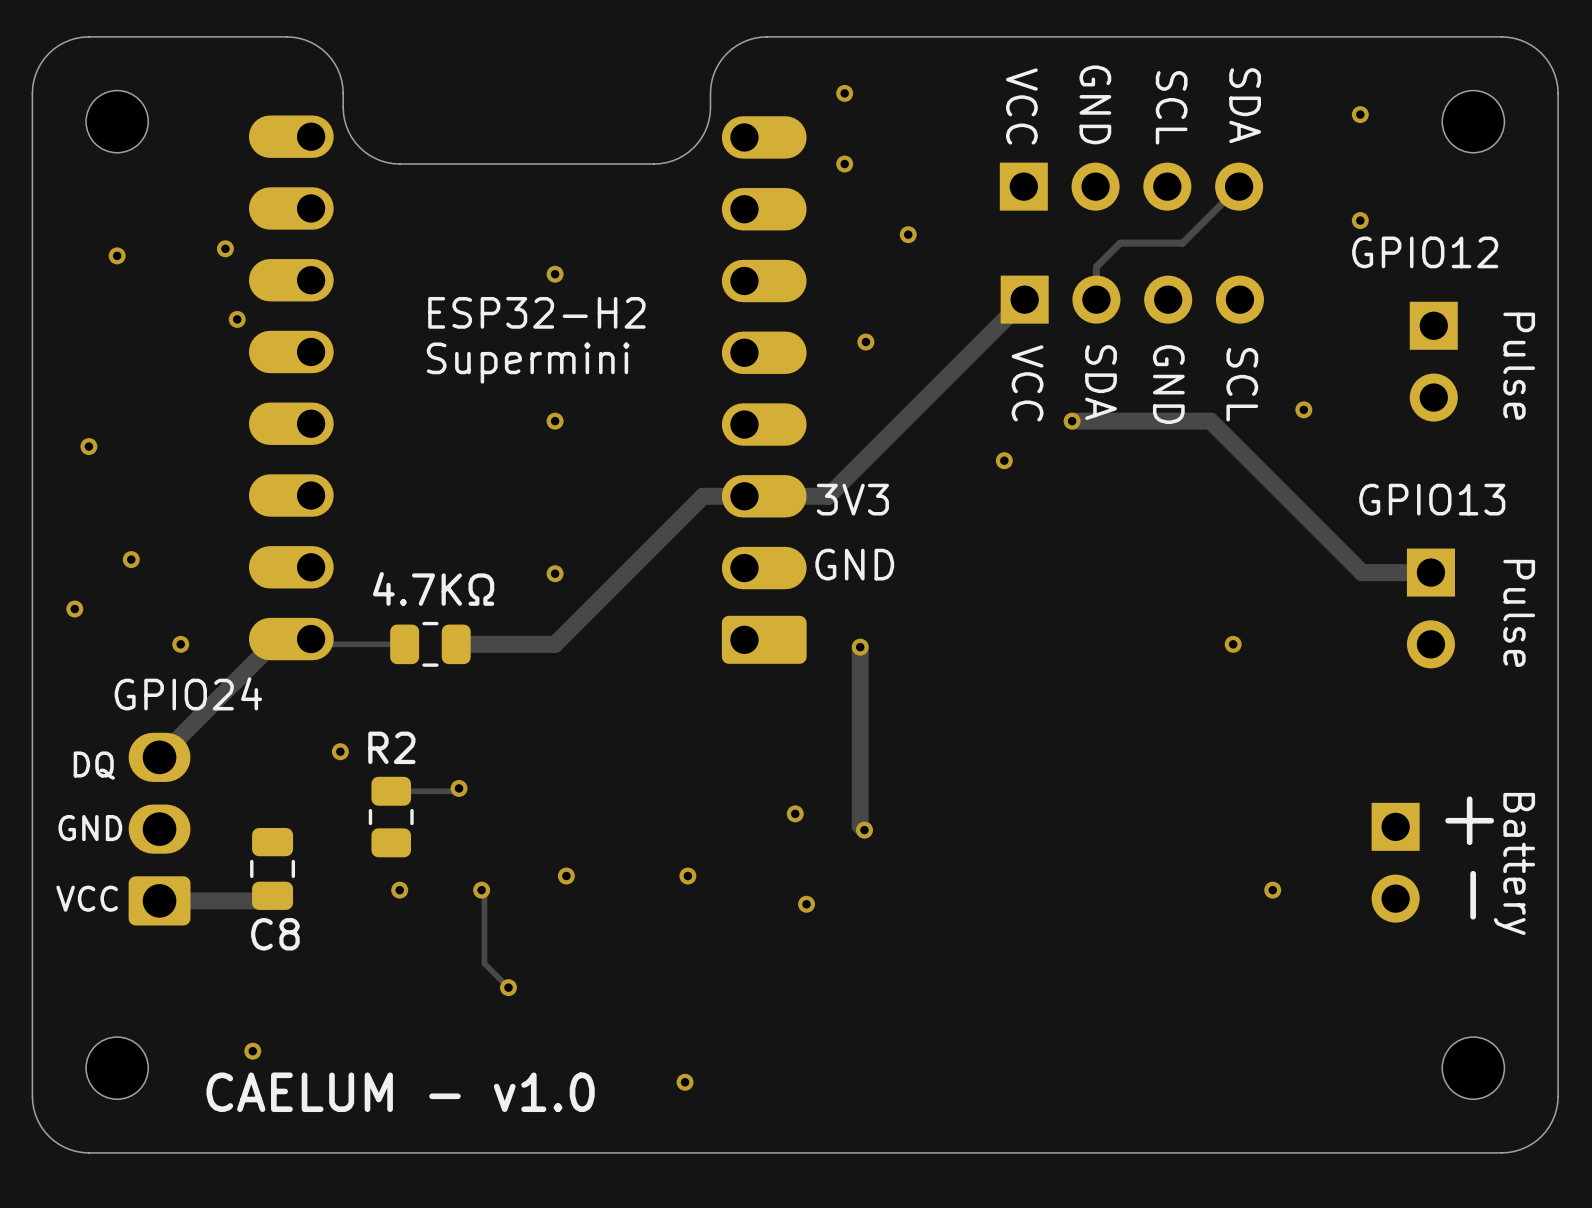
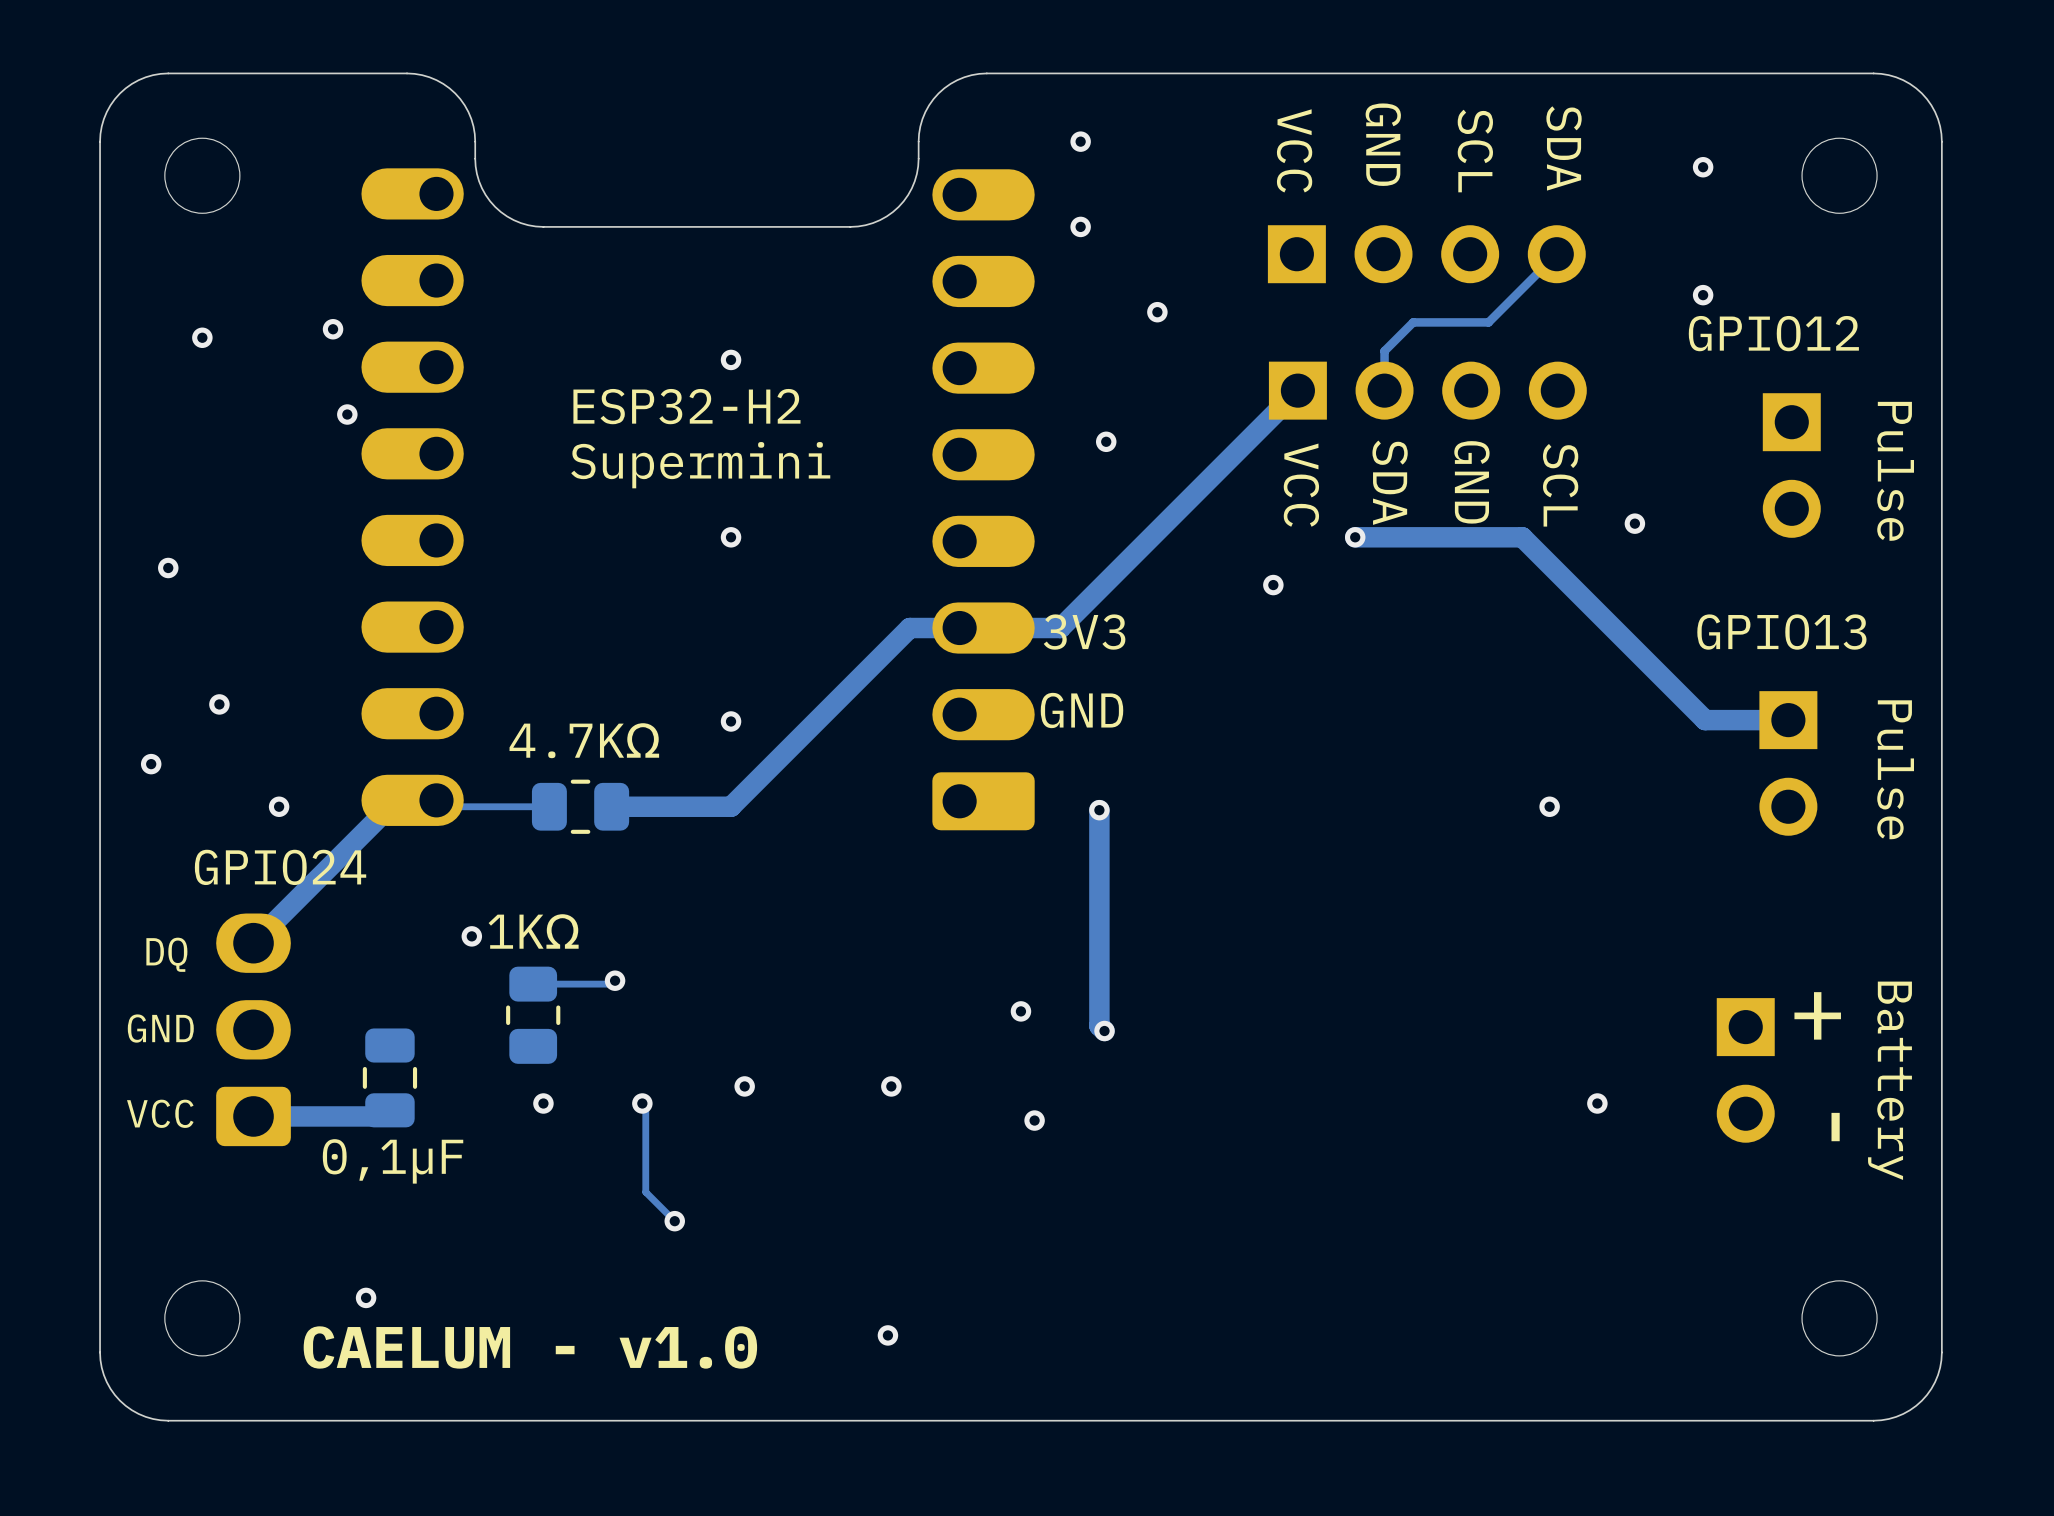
R2 name: R2 (391, 747) -> 1KΩ (533, 931)
C8 name: C8 (275, 934) -> 0,1µF (393, 1161)

